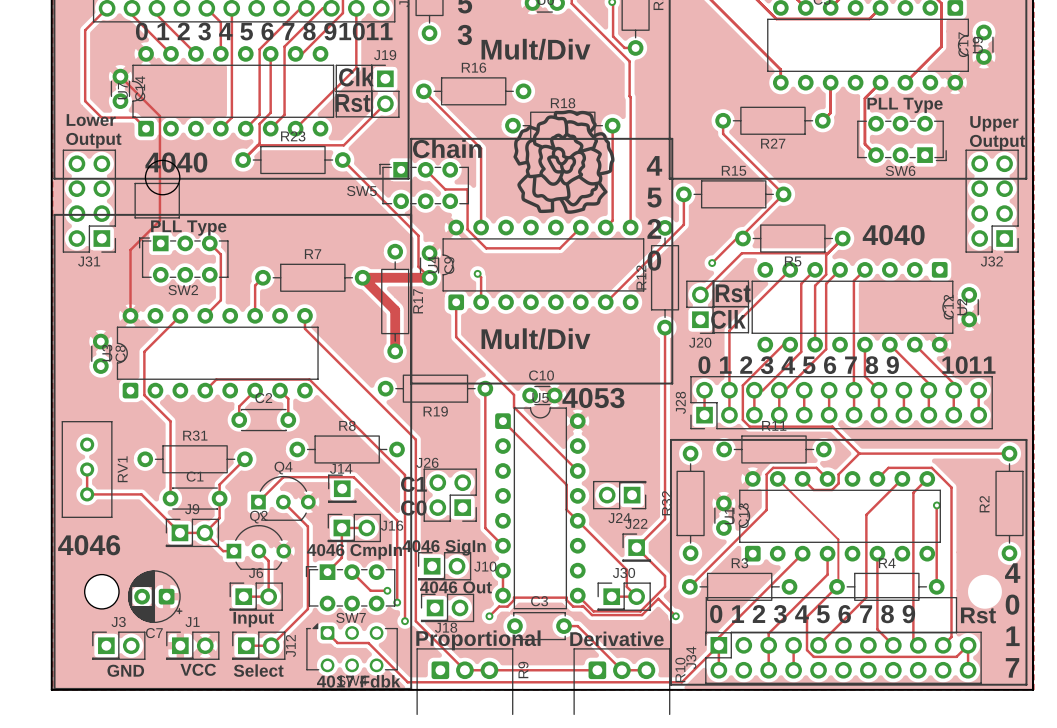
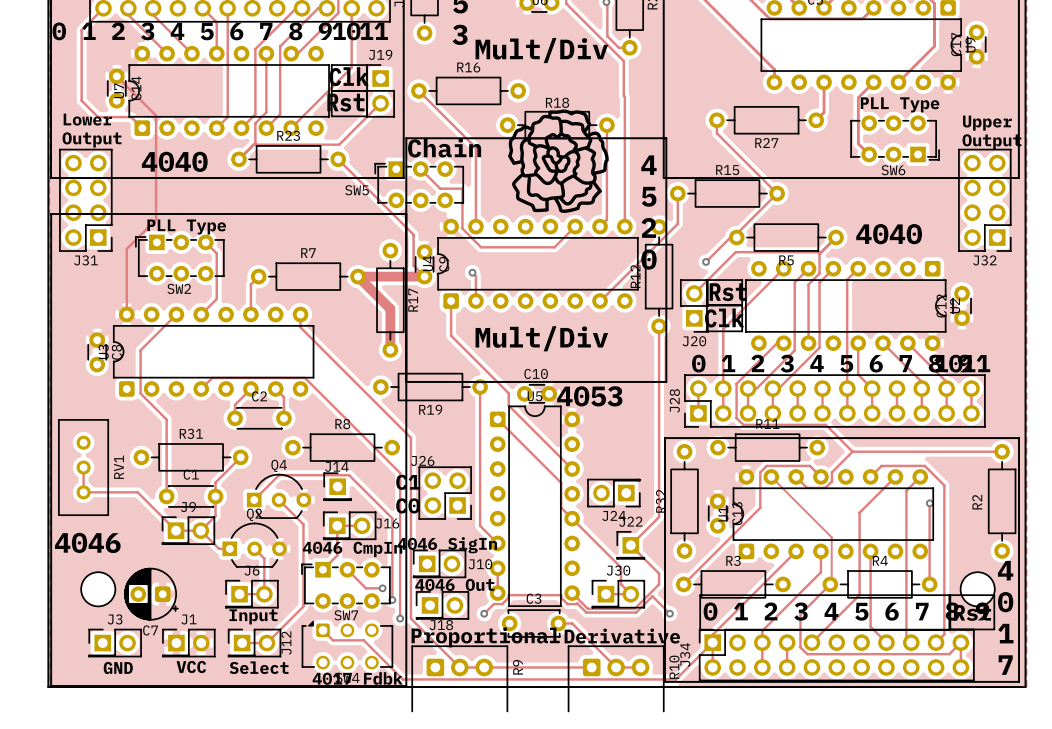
round board edge: [145, 160, 181, 195] -> none
line: (135, 183) (179, 183) (179, 217) (135, 217) (135, 183) -> none
round board edge: none -> [960, 571, 996, 607]
line: none -> (950, 595) (994, 595) (994, 629) (950, 629) (950, 595)

